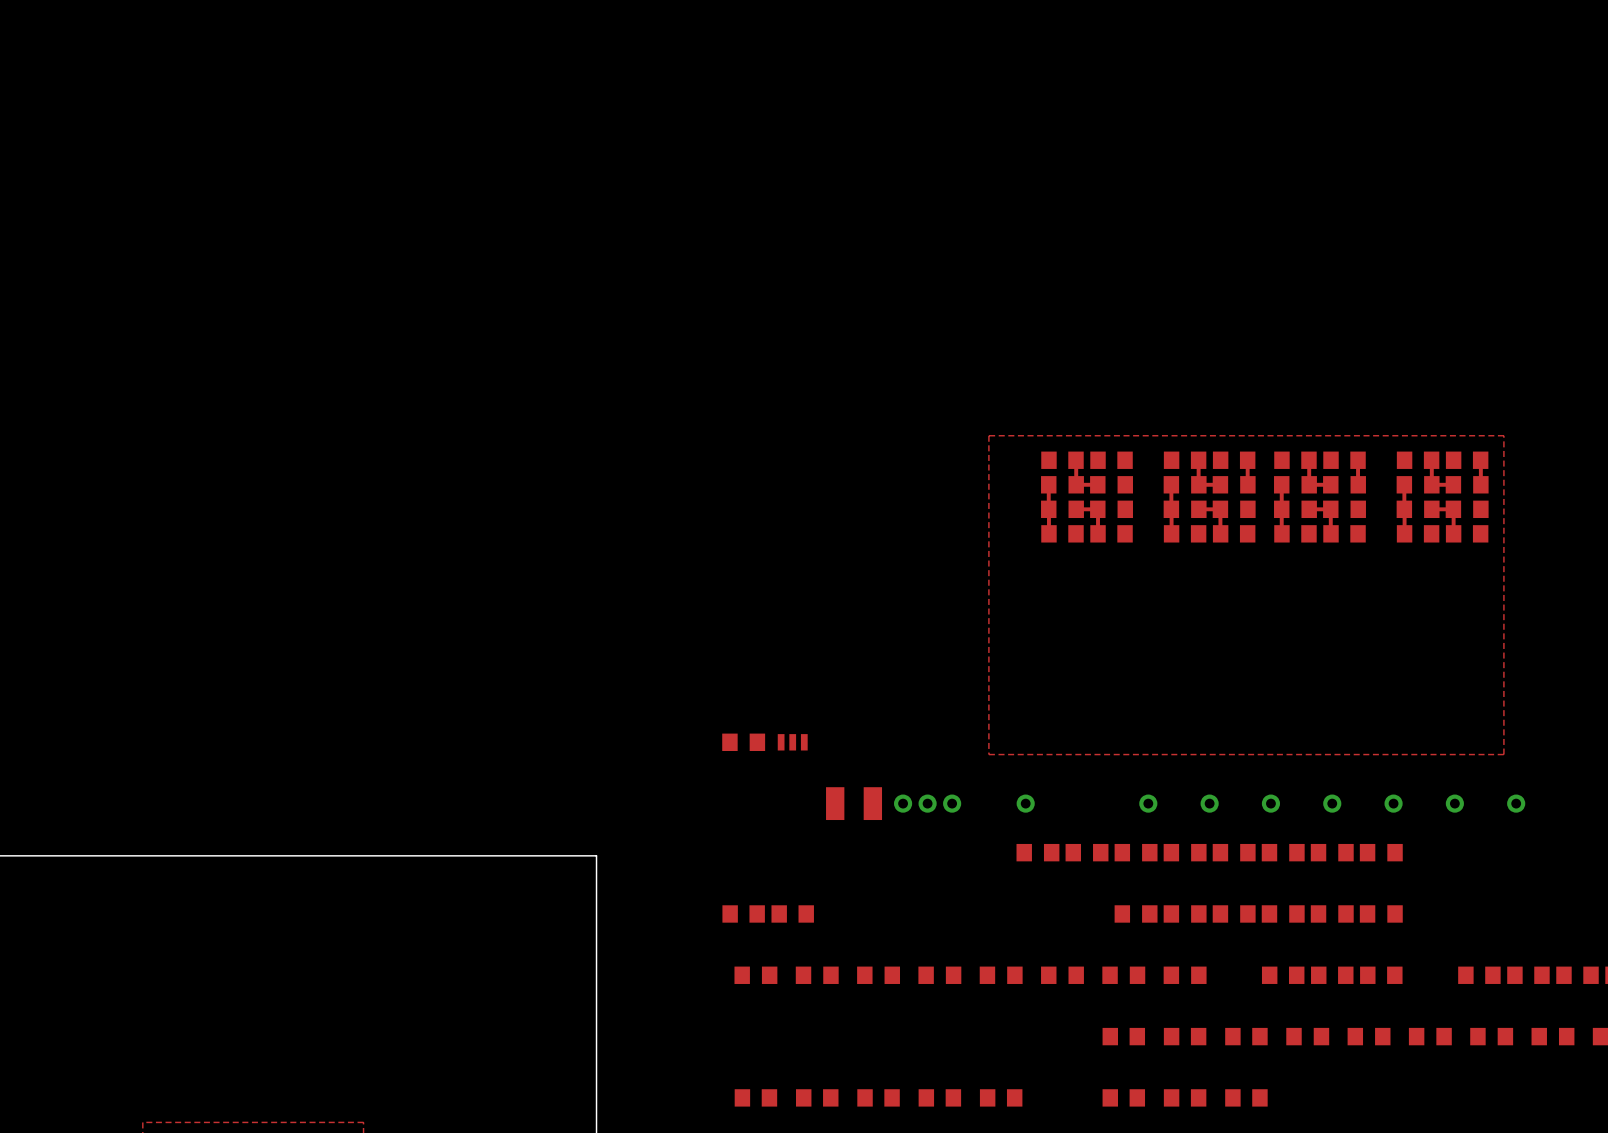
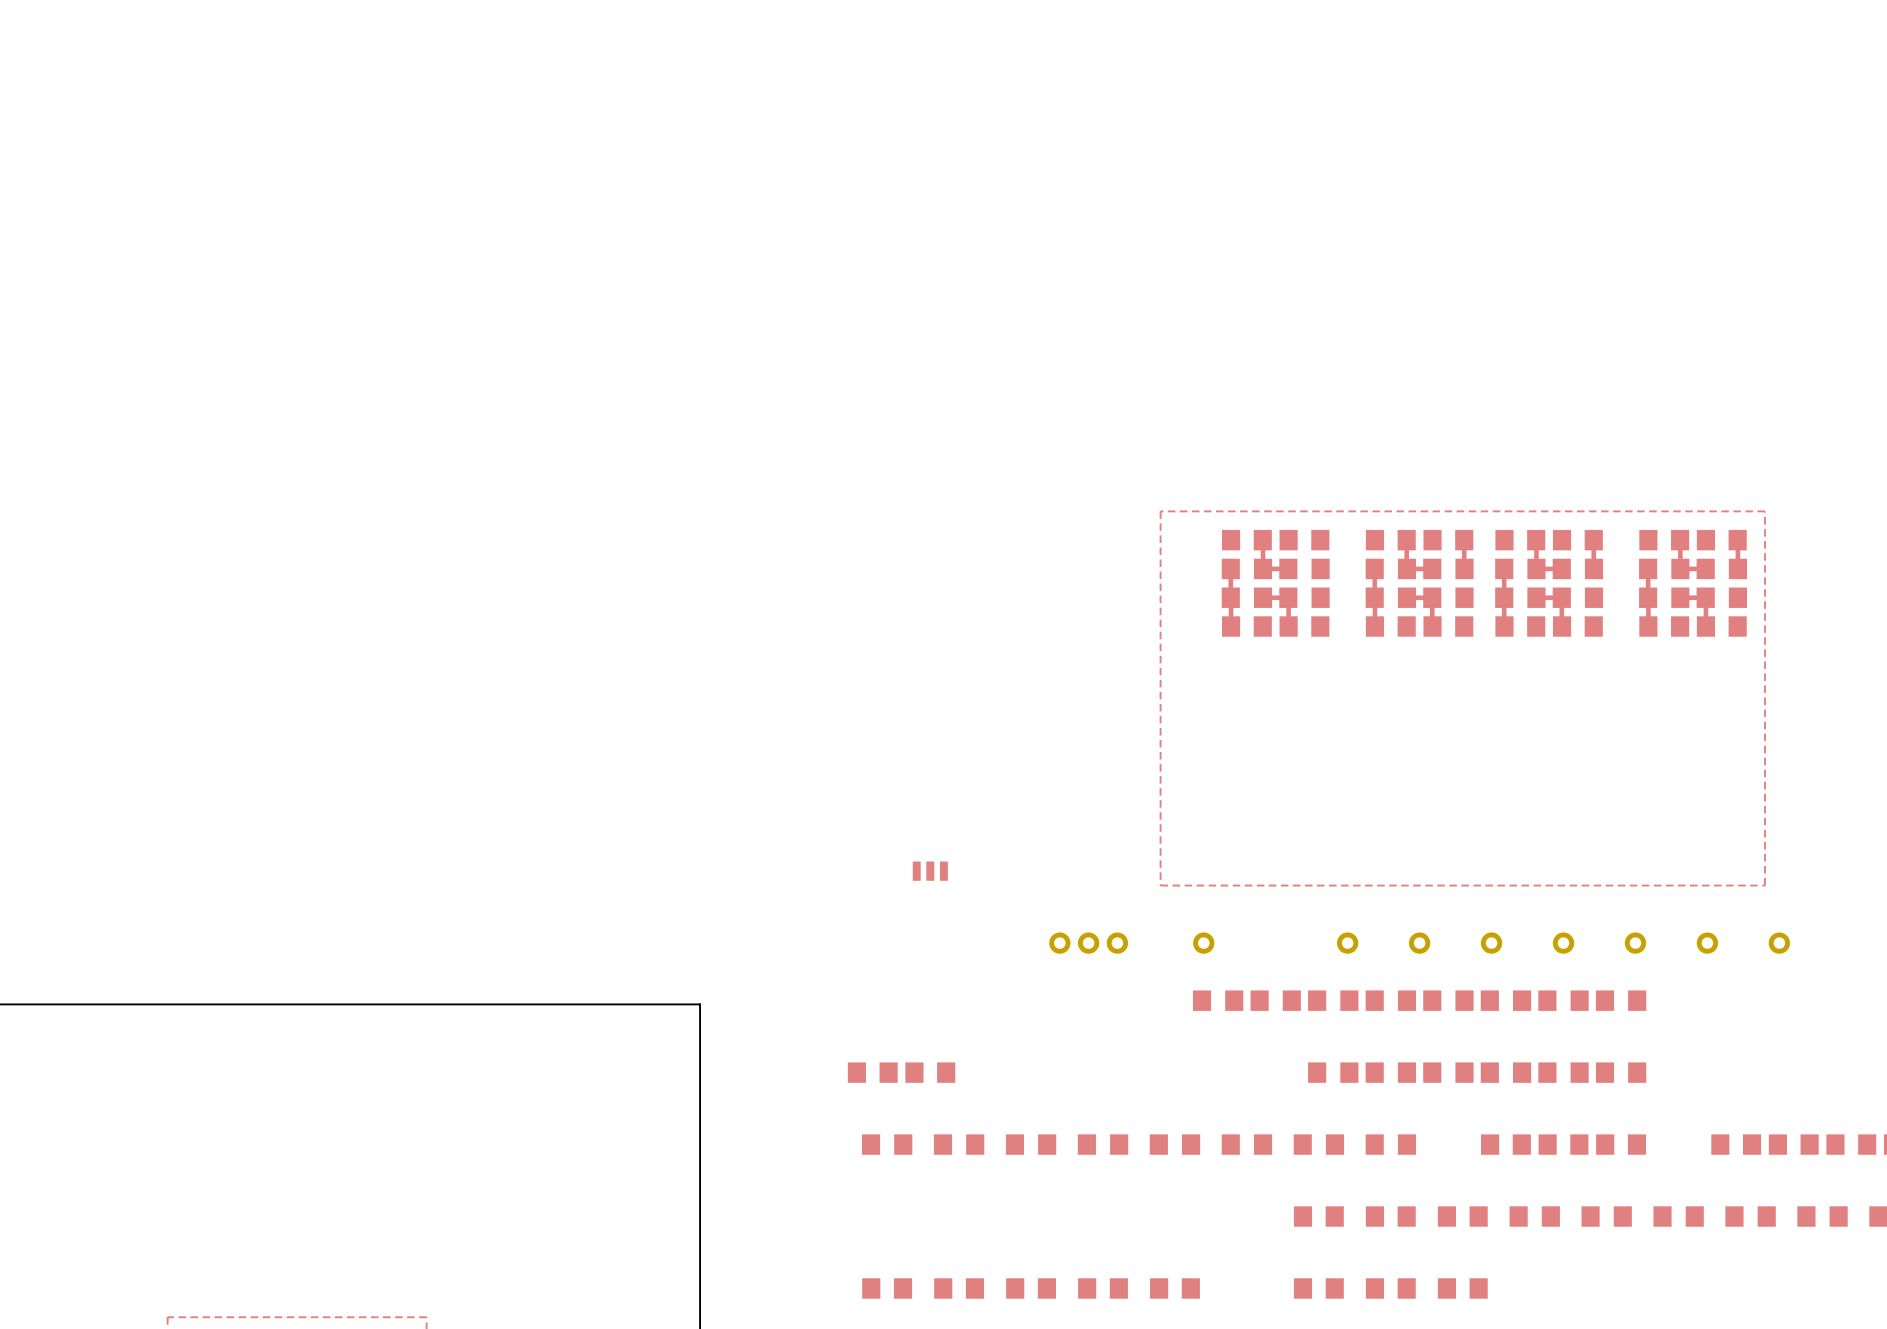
part: (743, 742) -> none
part: (854, 803) -> none

